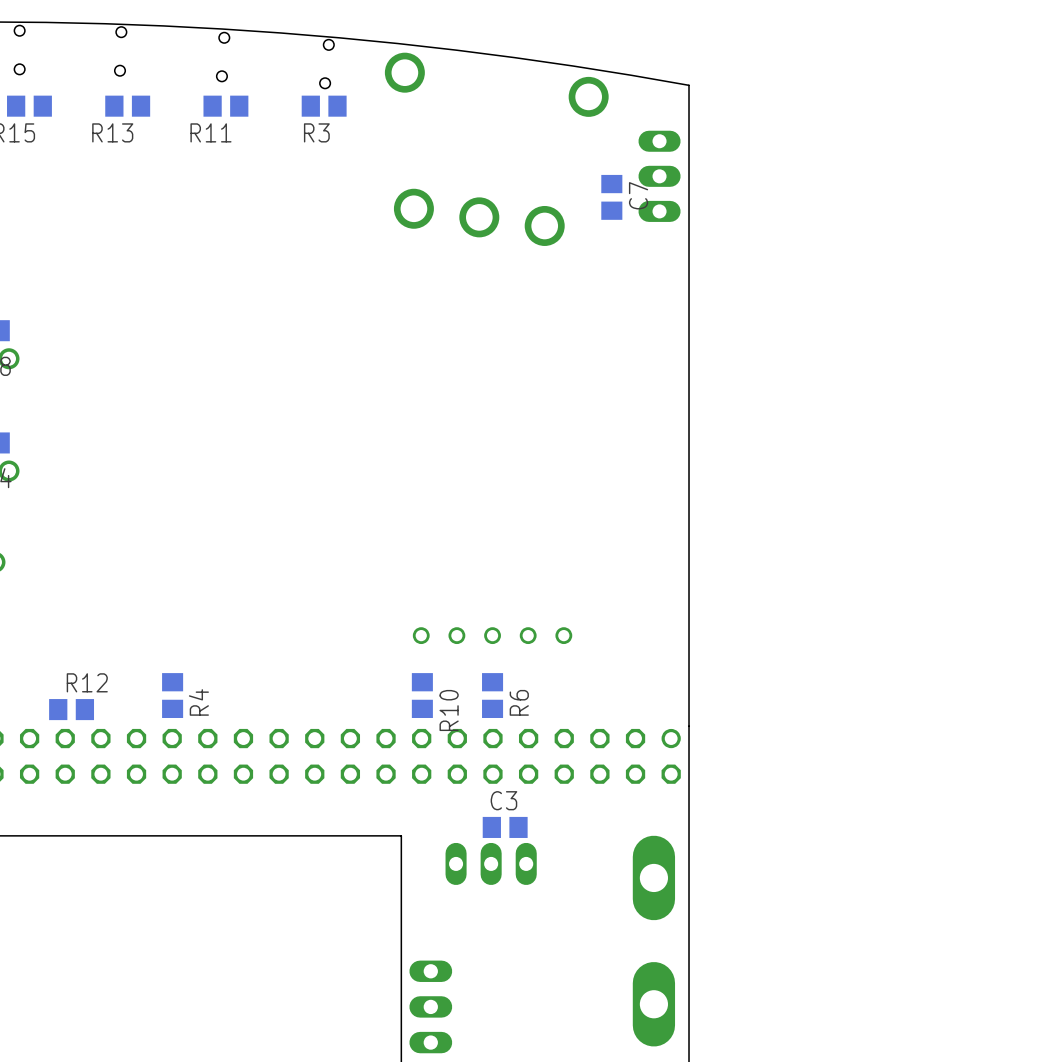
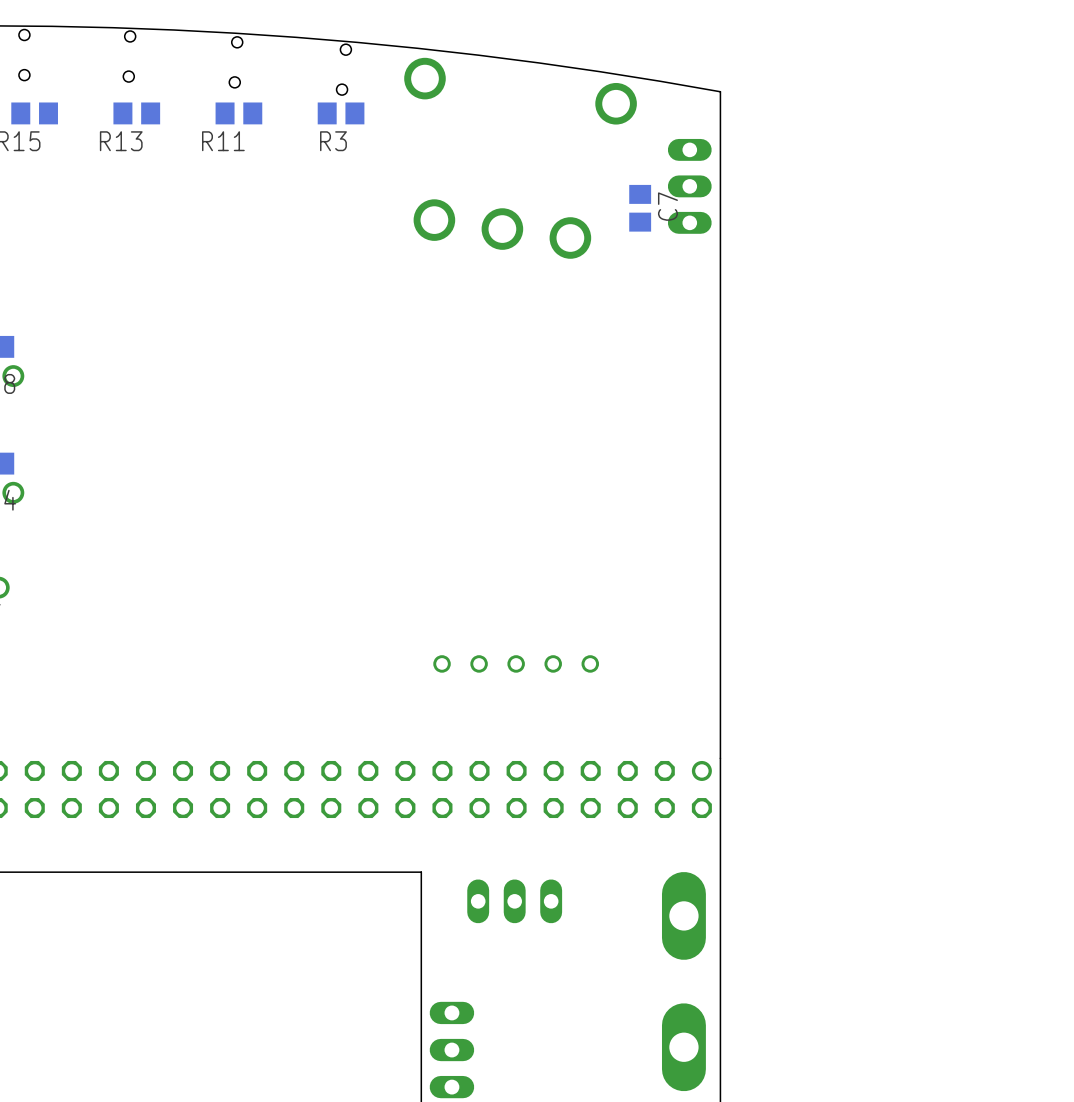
R4: (172, 695) -> none
R10: (422, 695) -> none
R6: (492, 695) -> none
R12: (71, 709) -> none
C3: (505, 827) -> none

